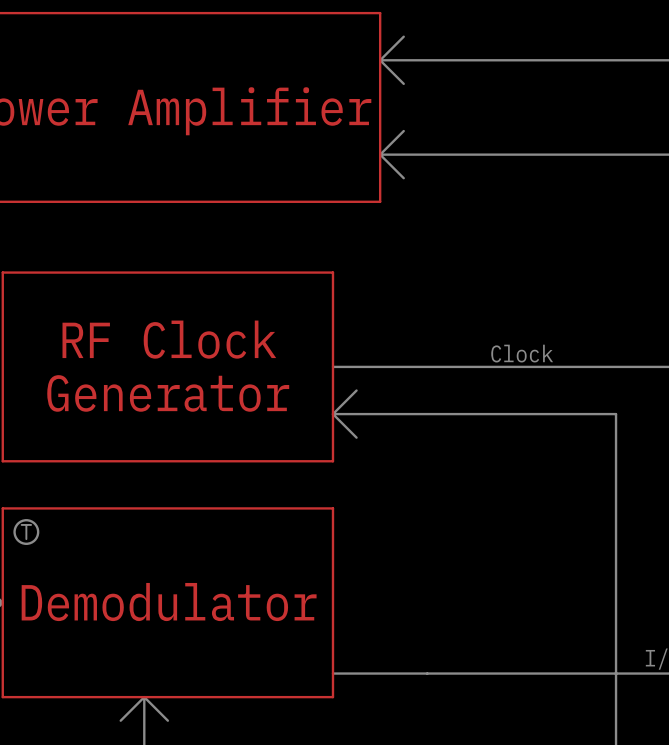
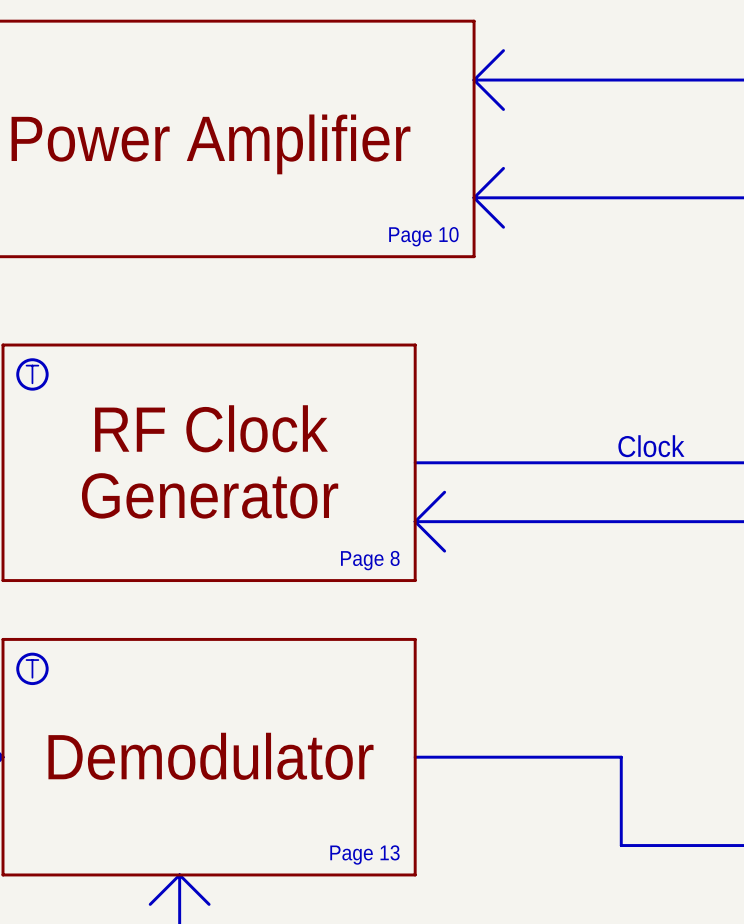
text: none -> Page 10 (423, 236)
part: none -> (32, 374)
text: none -> Page 8 (370, 560)
line: (332, 673) (498, 673) -> (415, 757) (621, 757) (621, 845)
text: none -> Page 13 (364, 854)

